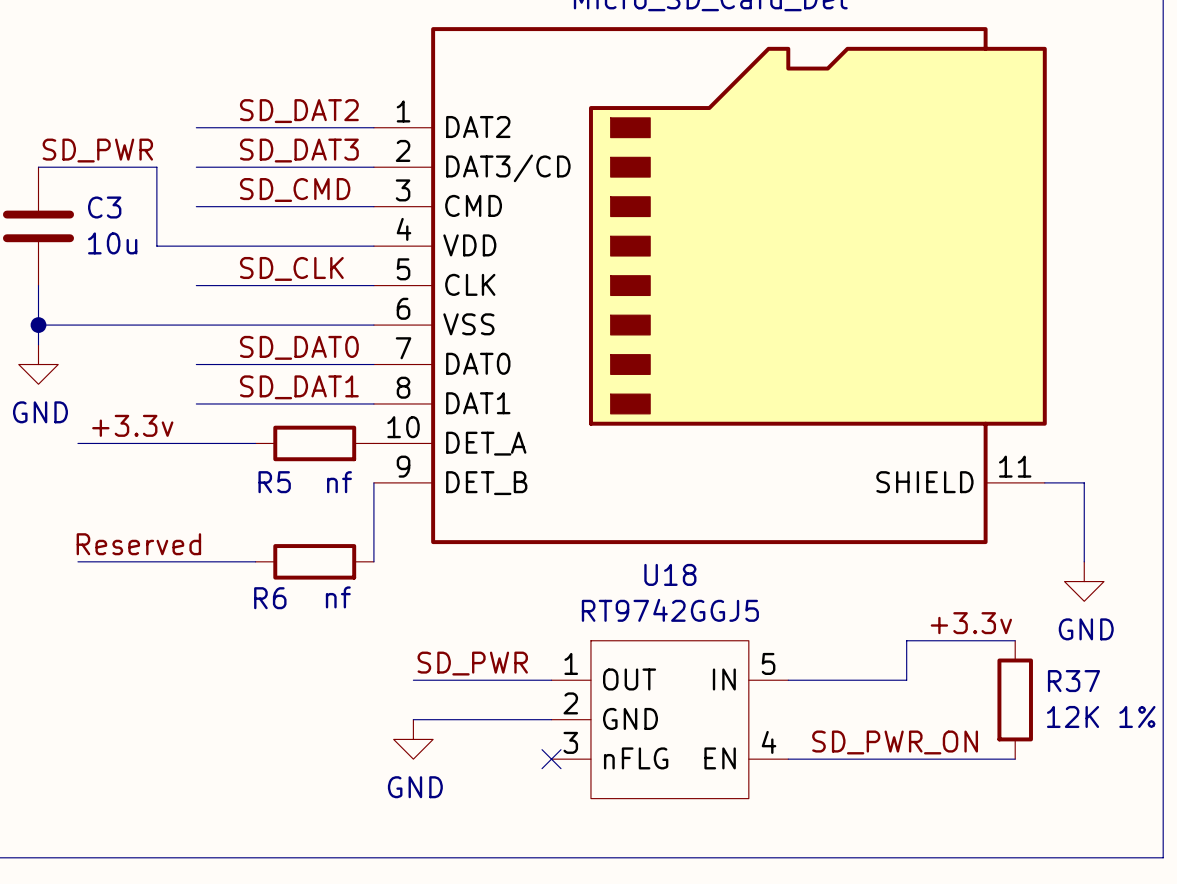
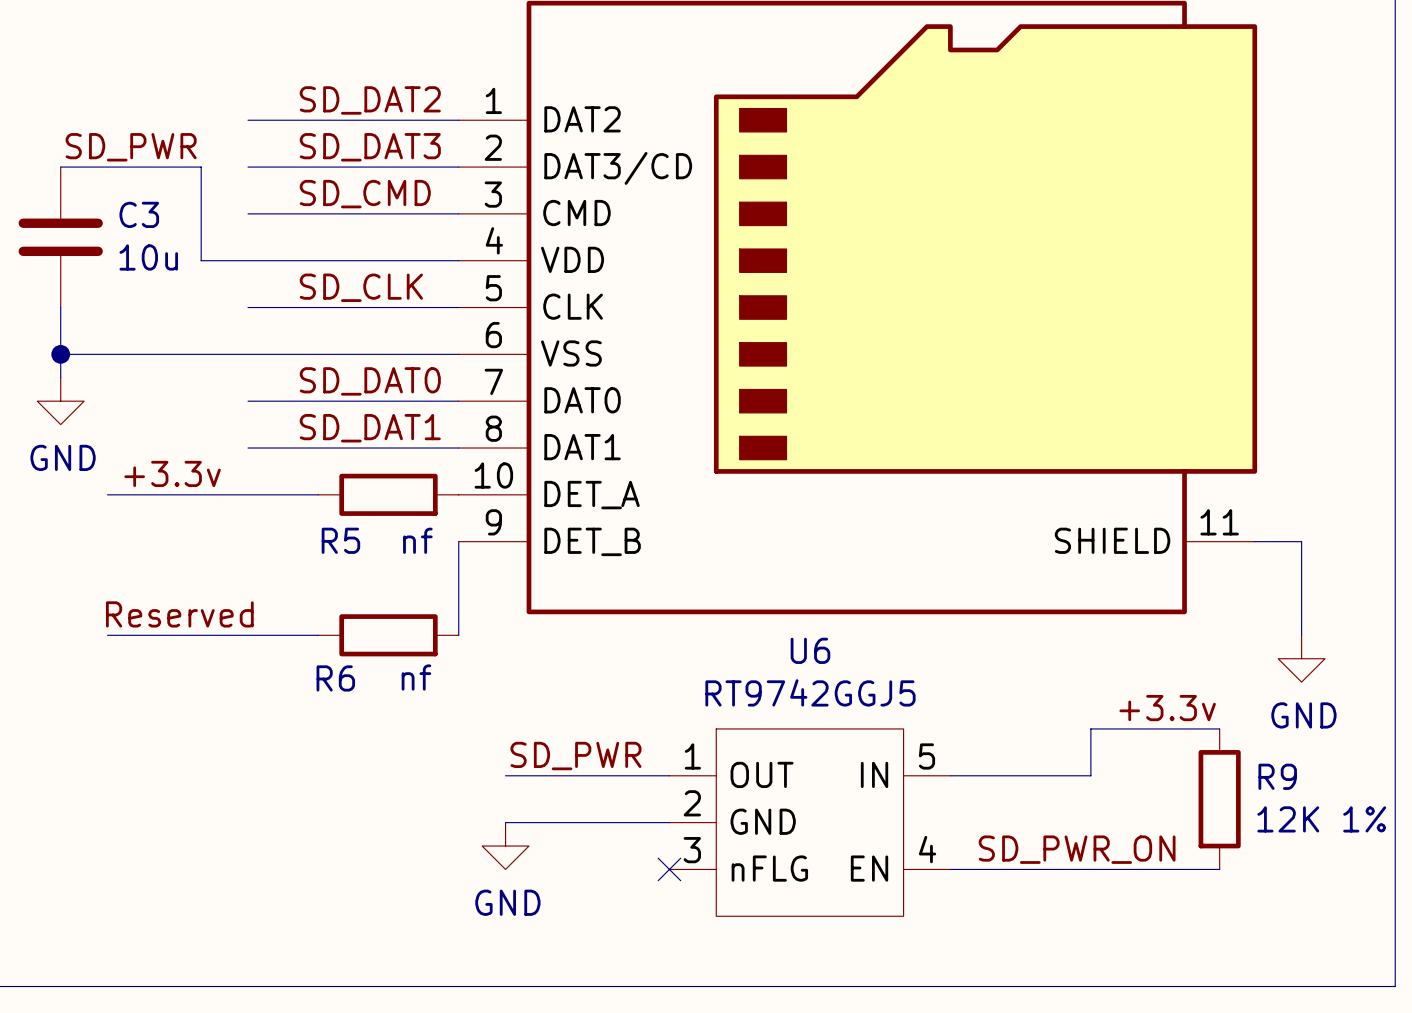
U18 name: U18 (670, 574) -> U6 (810, 650)
R37 name: R37 (1073, 681) -> R9 (1277, 776)

